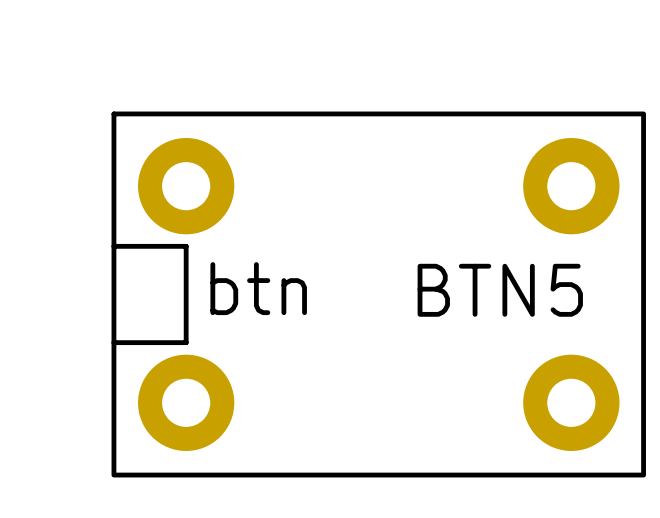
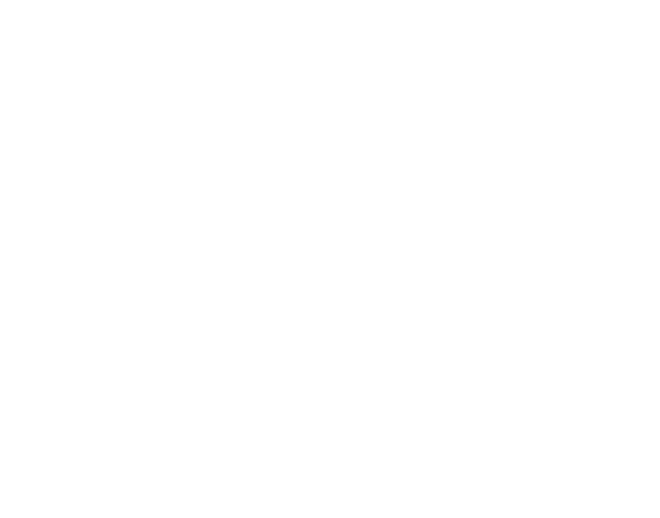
BTN5: (378, 294) -> none

